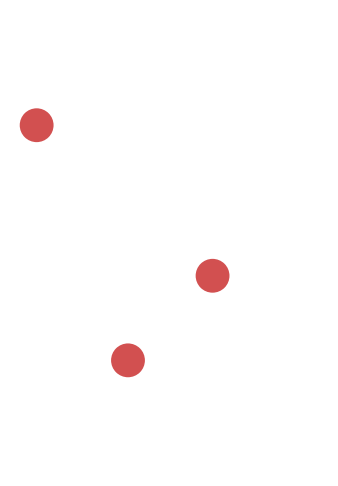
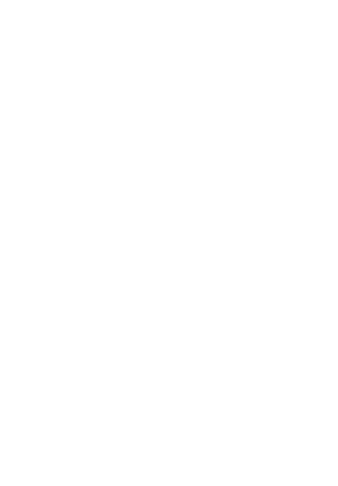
part: (36, 125) -> none
part: (212, 275) -> none
part: (127, 360) -> none

